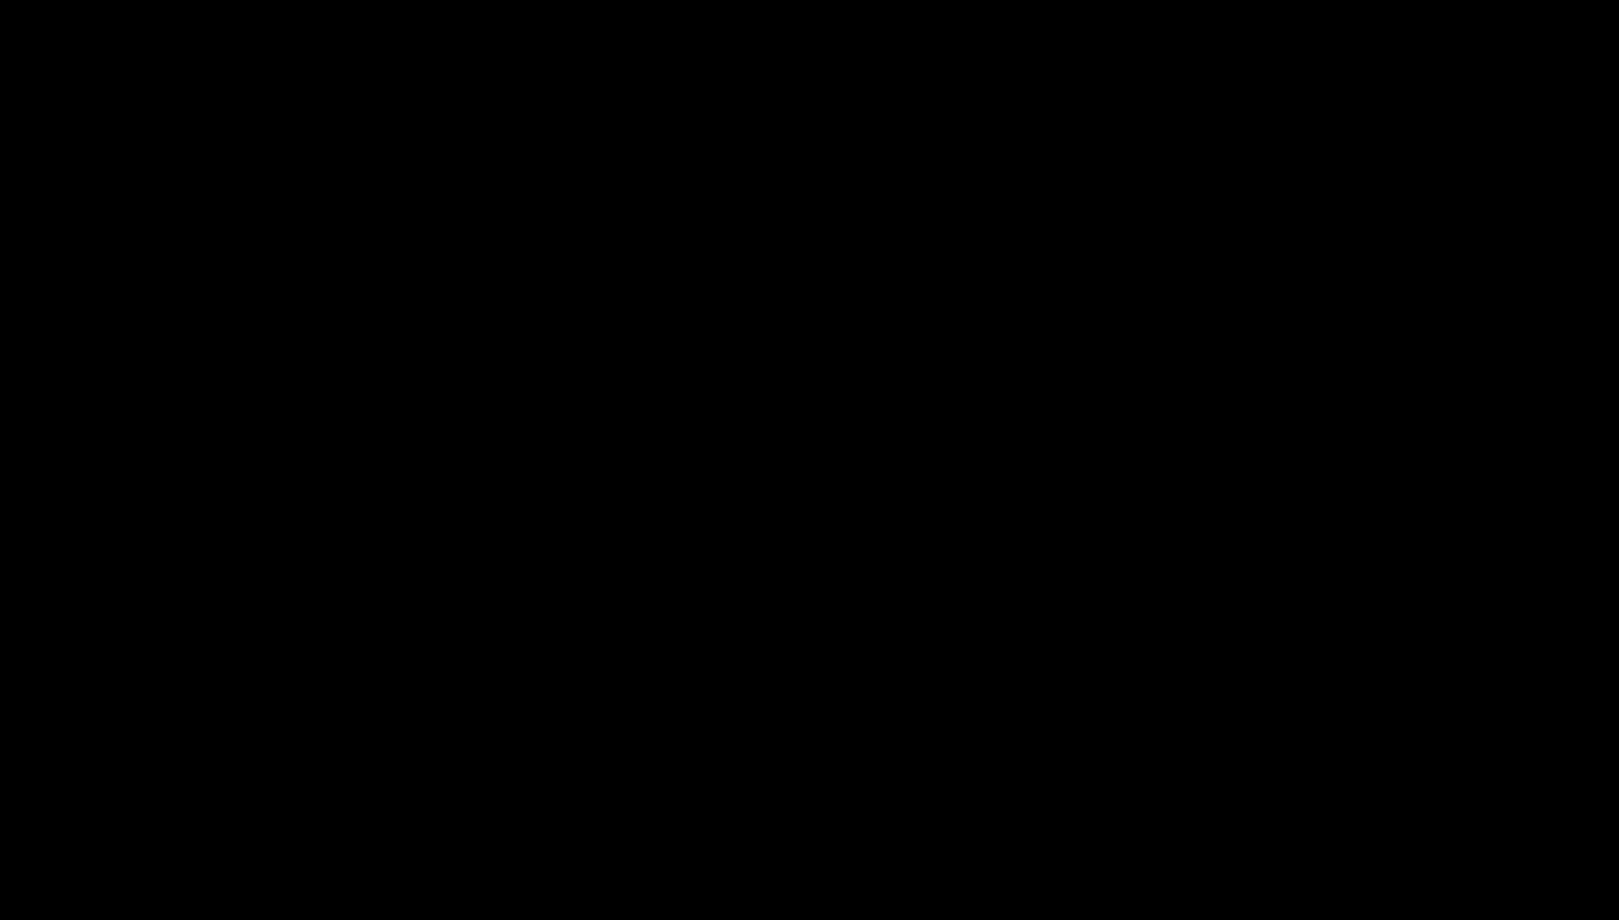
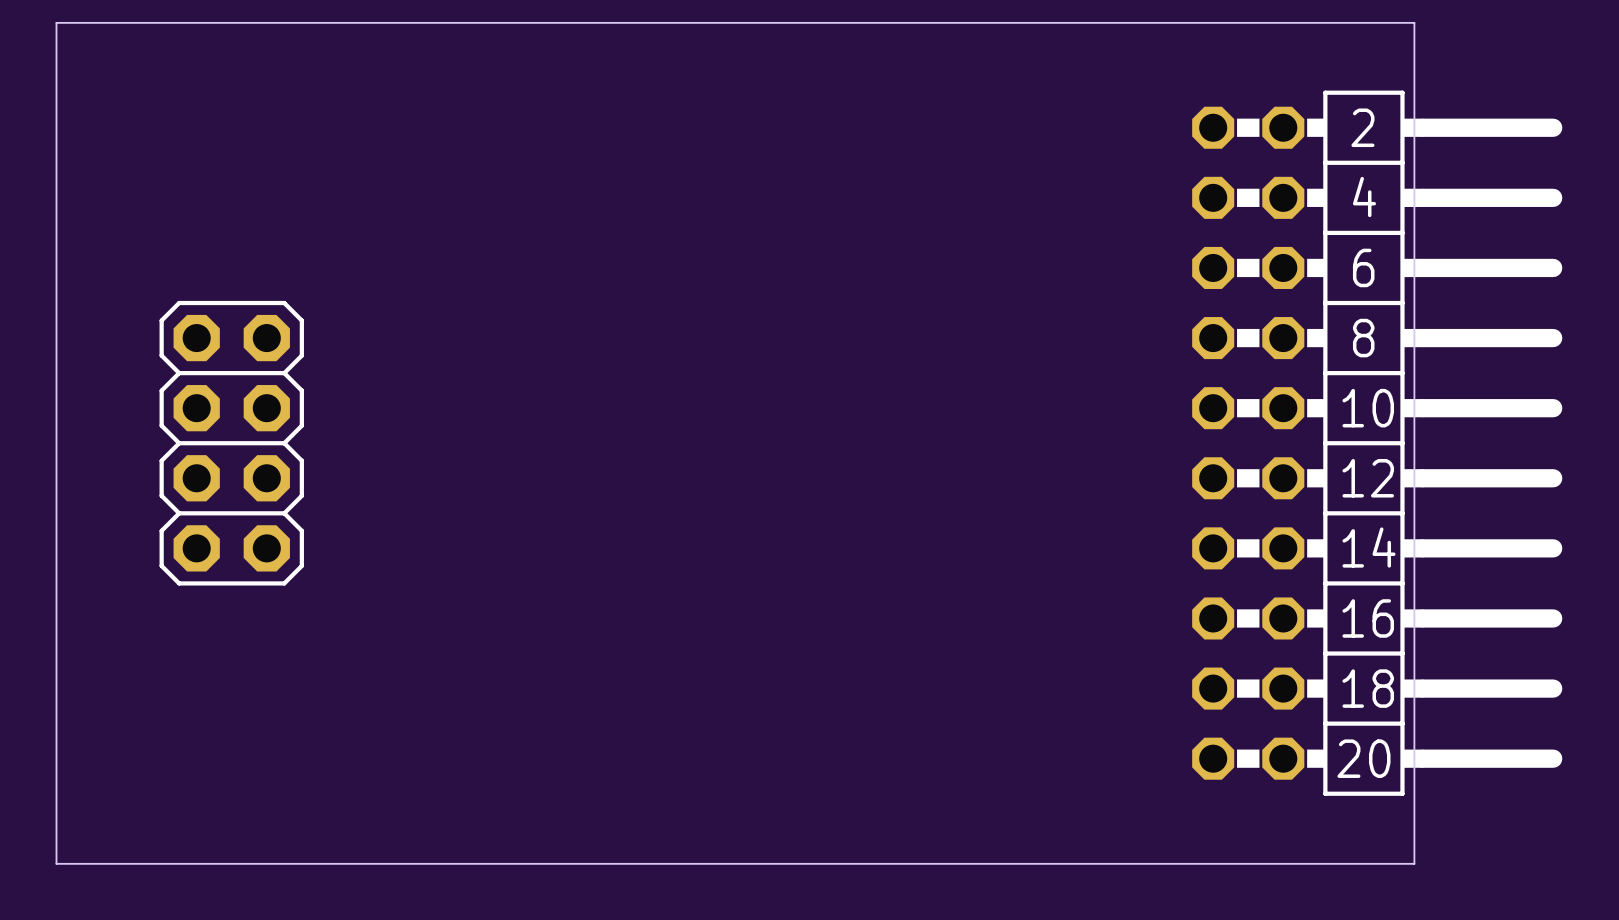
board edge: none -> (56, 22) (1414, 22) (1414, 863) (56, 863) (56, 22)
part: none -> (231, 443)
part: none -> (1377, 443)

